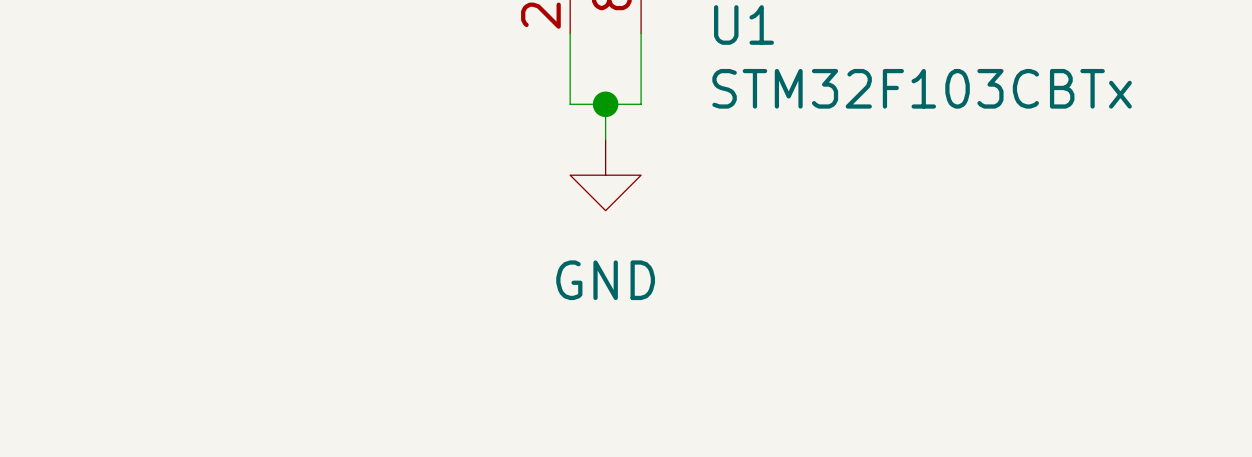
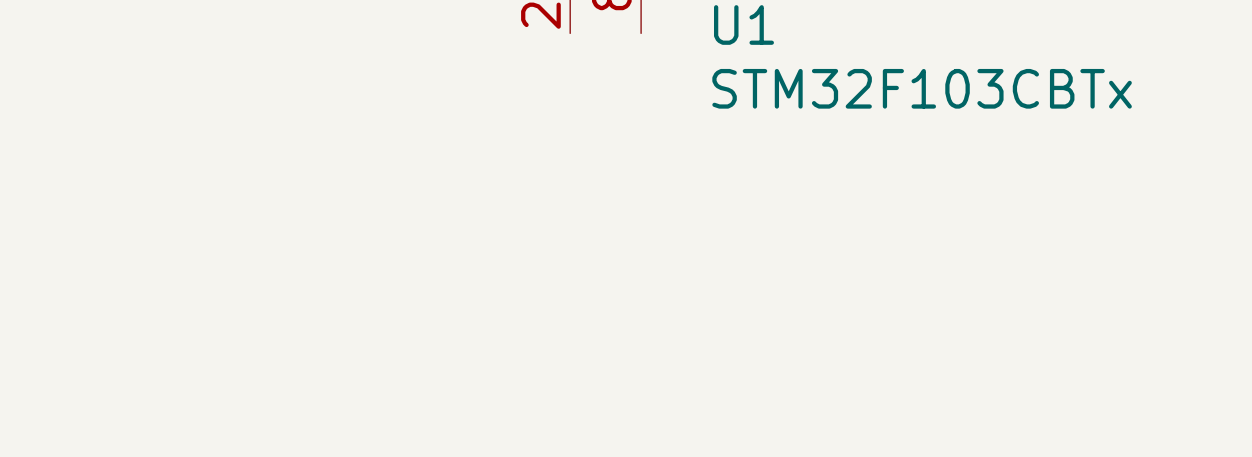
wire: (570, 33) (570, 104) (641, 104) (641, 33) -> none
wire: (605, 104) (605, 139) -> none
junction: (605, 104) -> none
power symbol: GND (605, 175) -> none

